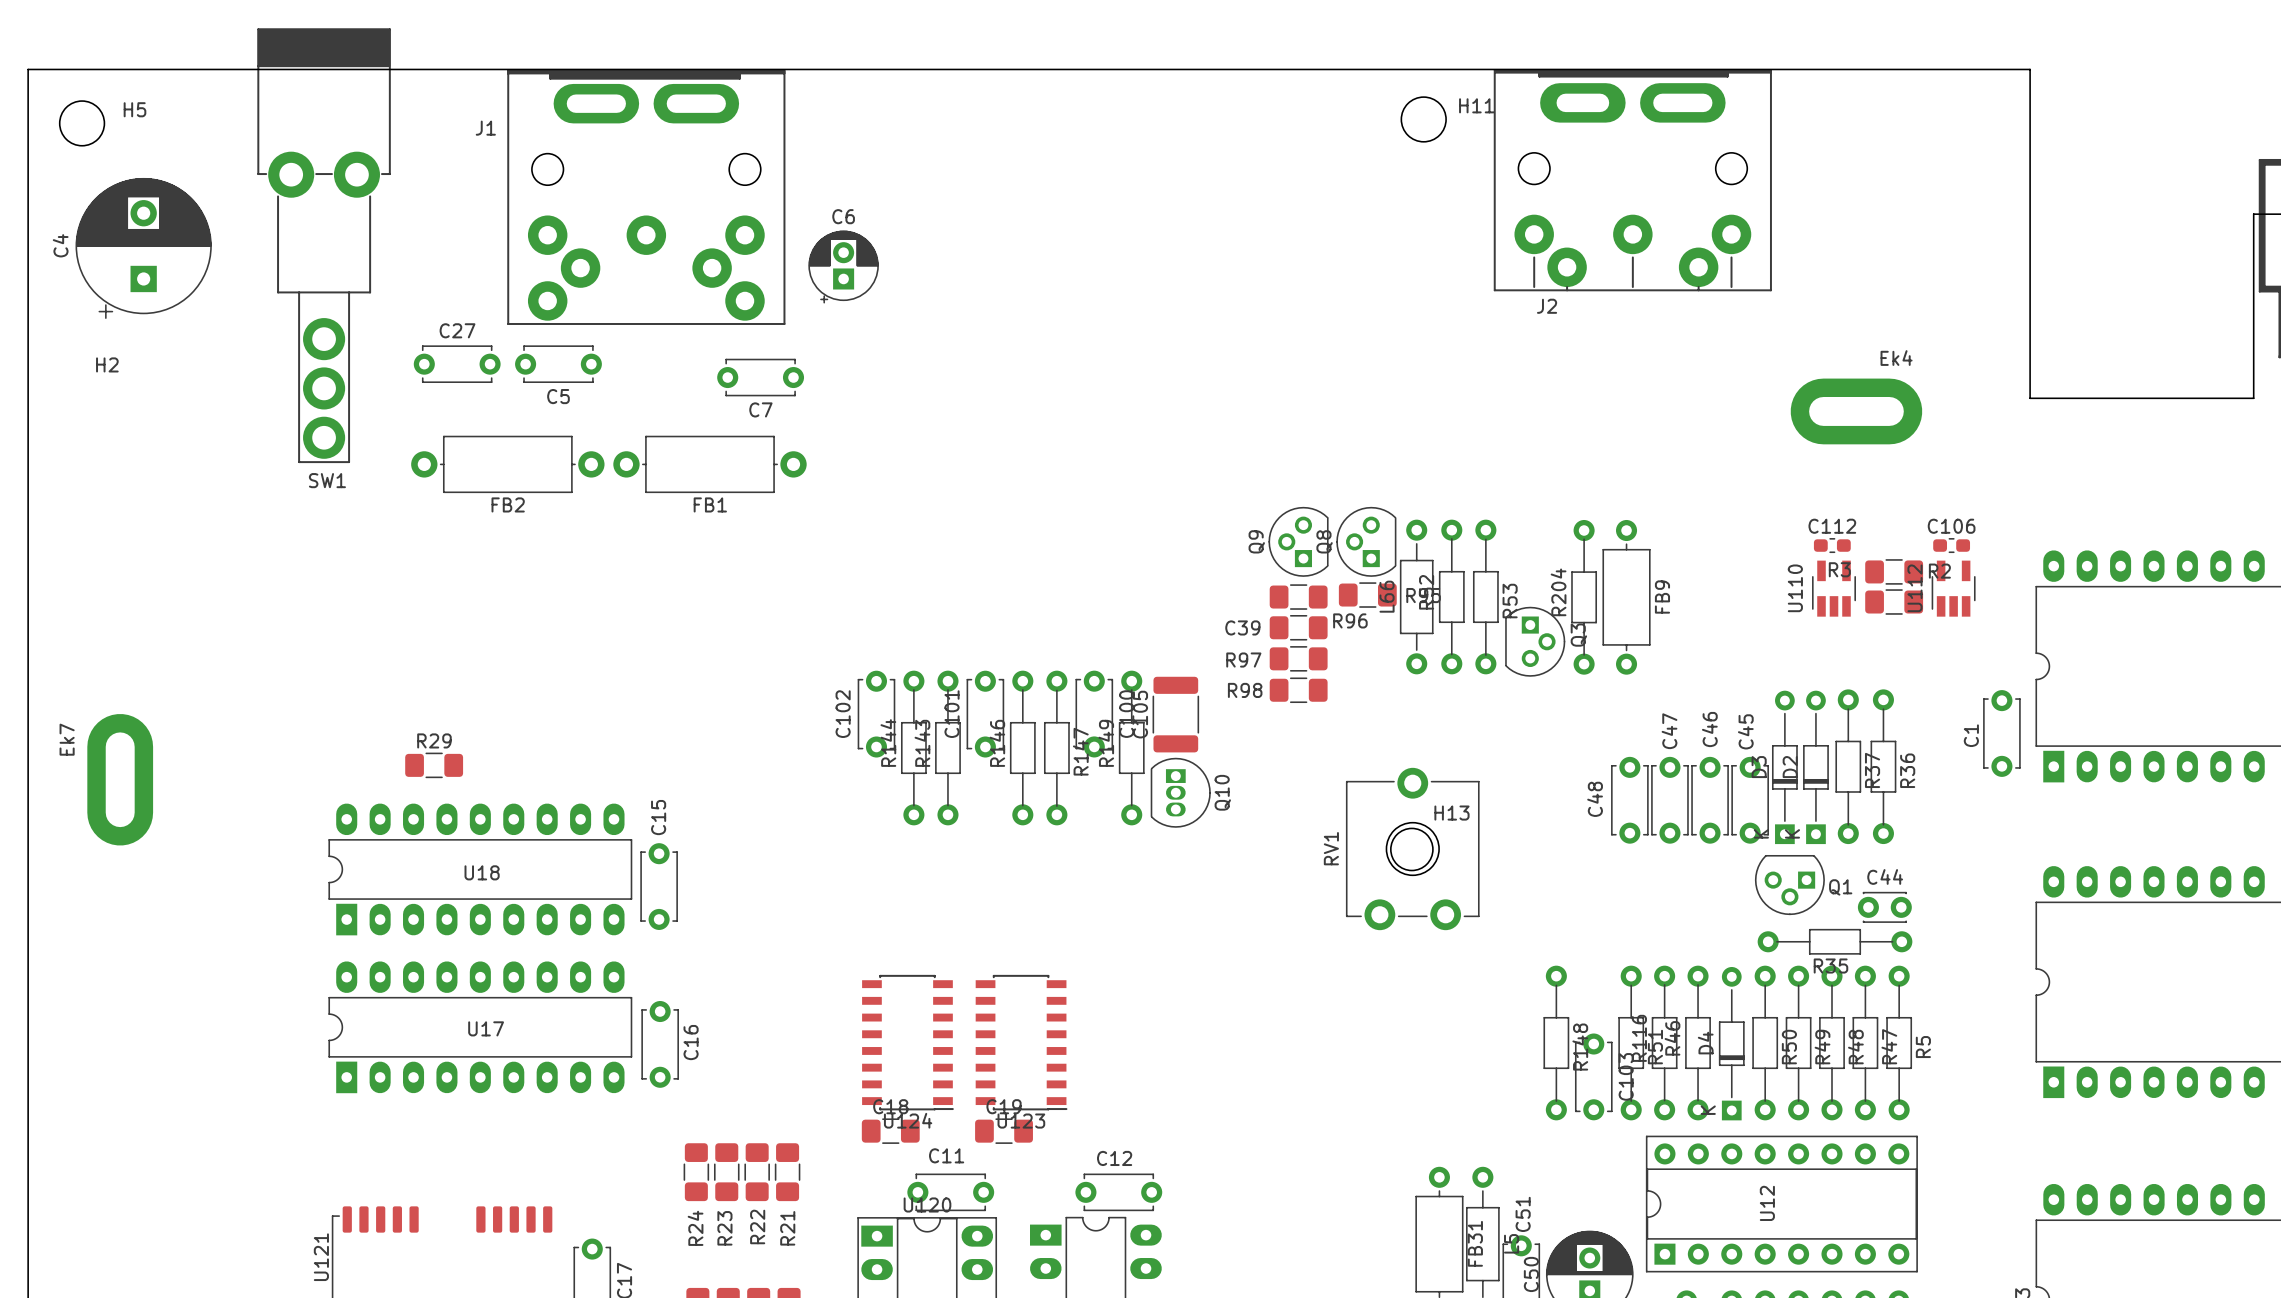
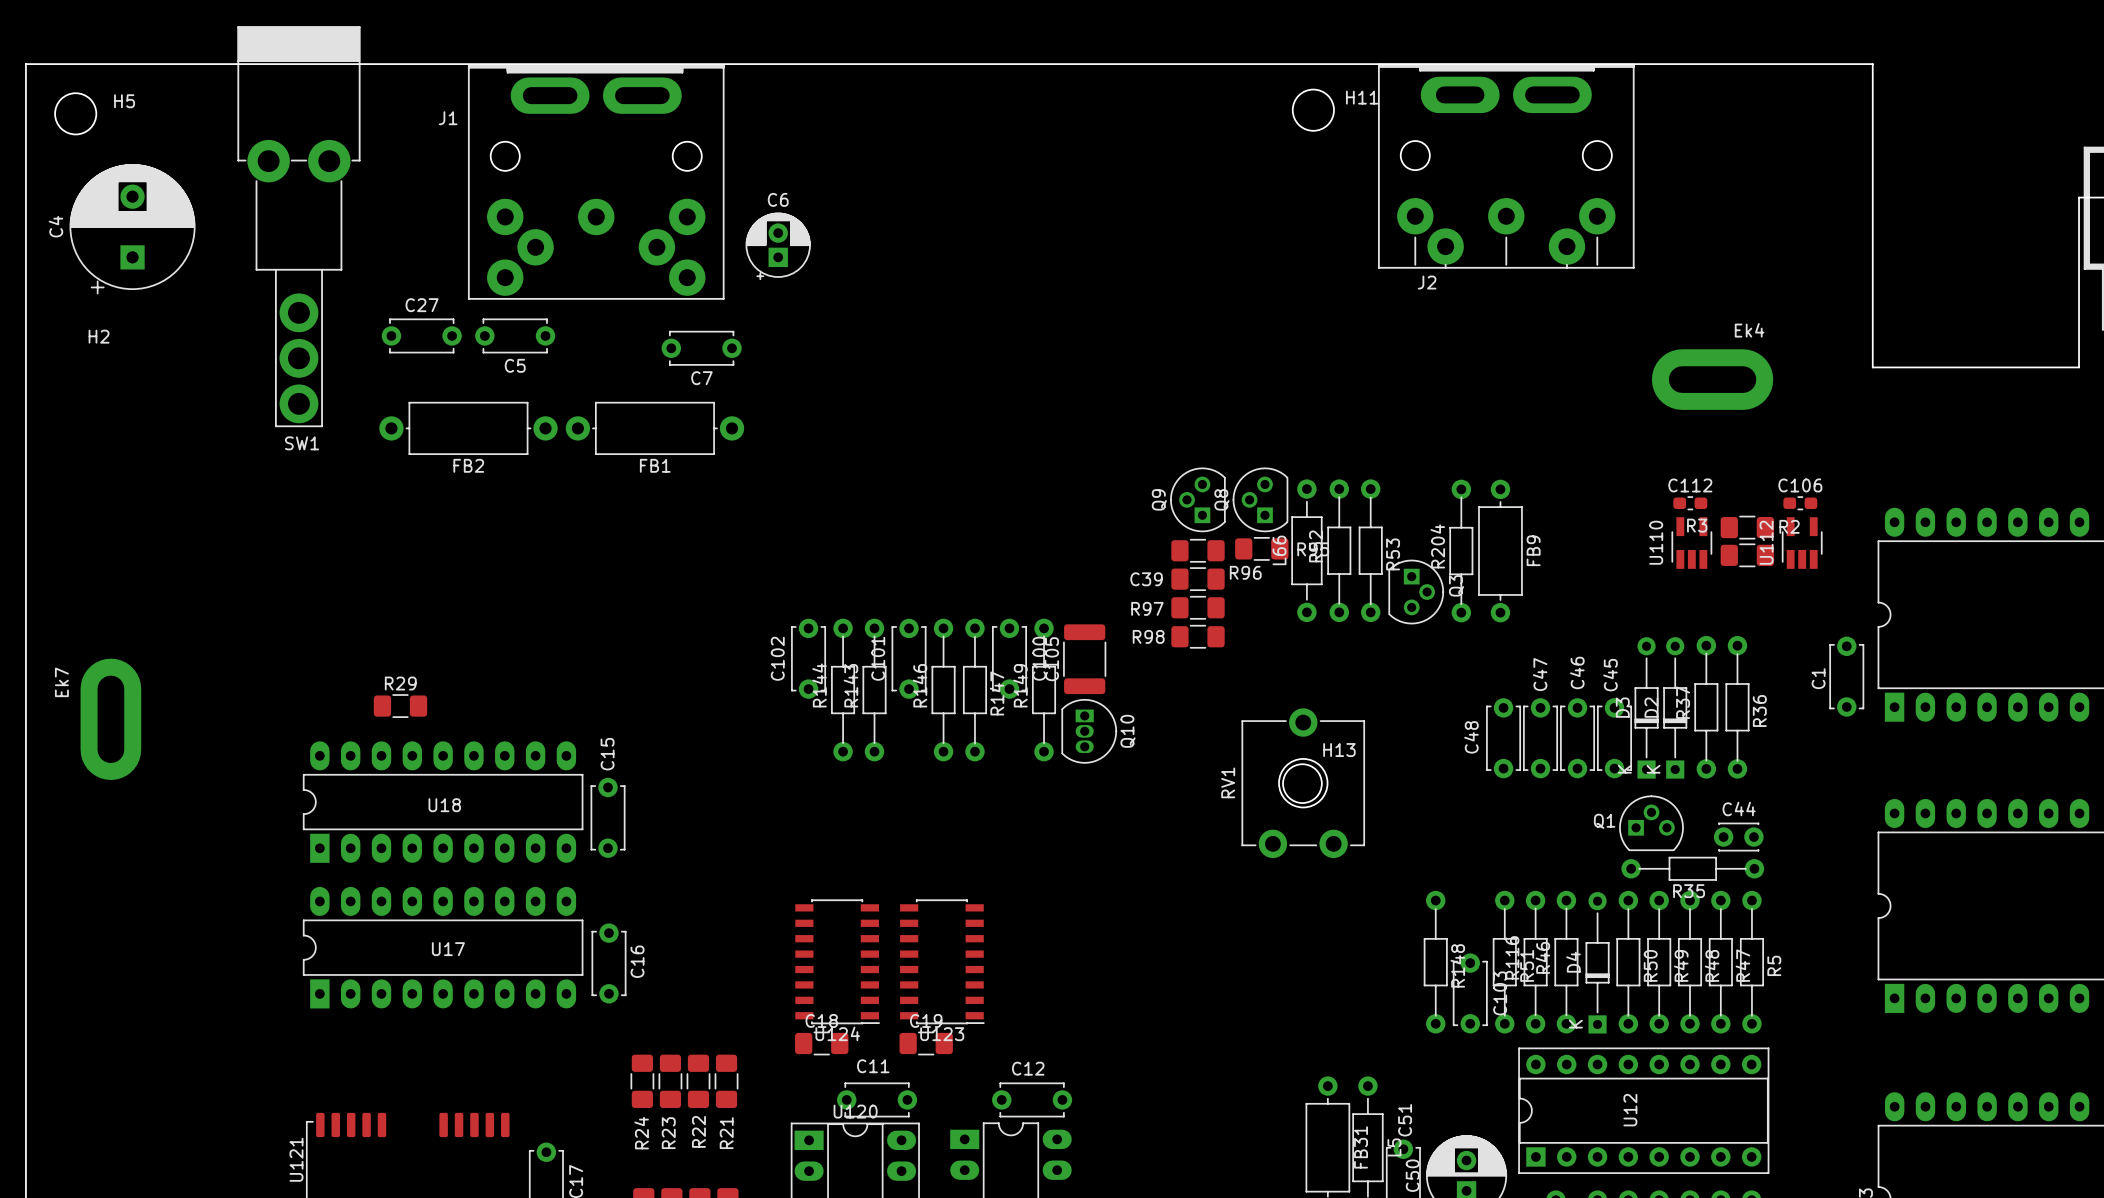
R37 rotation: 0° (1848, 766) -> 180° (1706, 707)
Q1 rotation: 0° (1789, 885) -> 180° (1651, 823)

